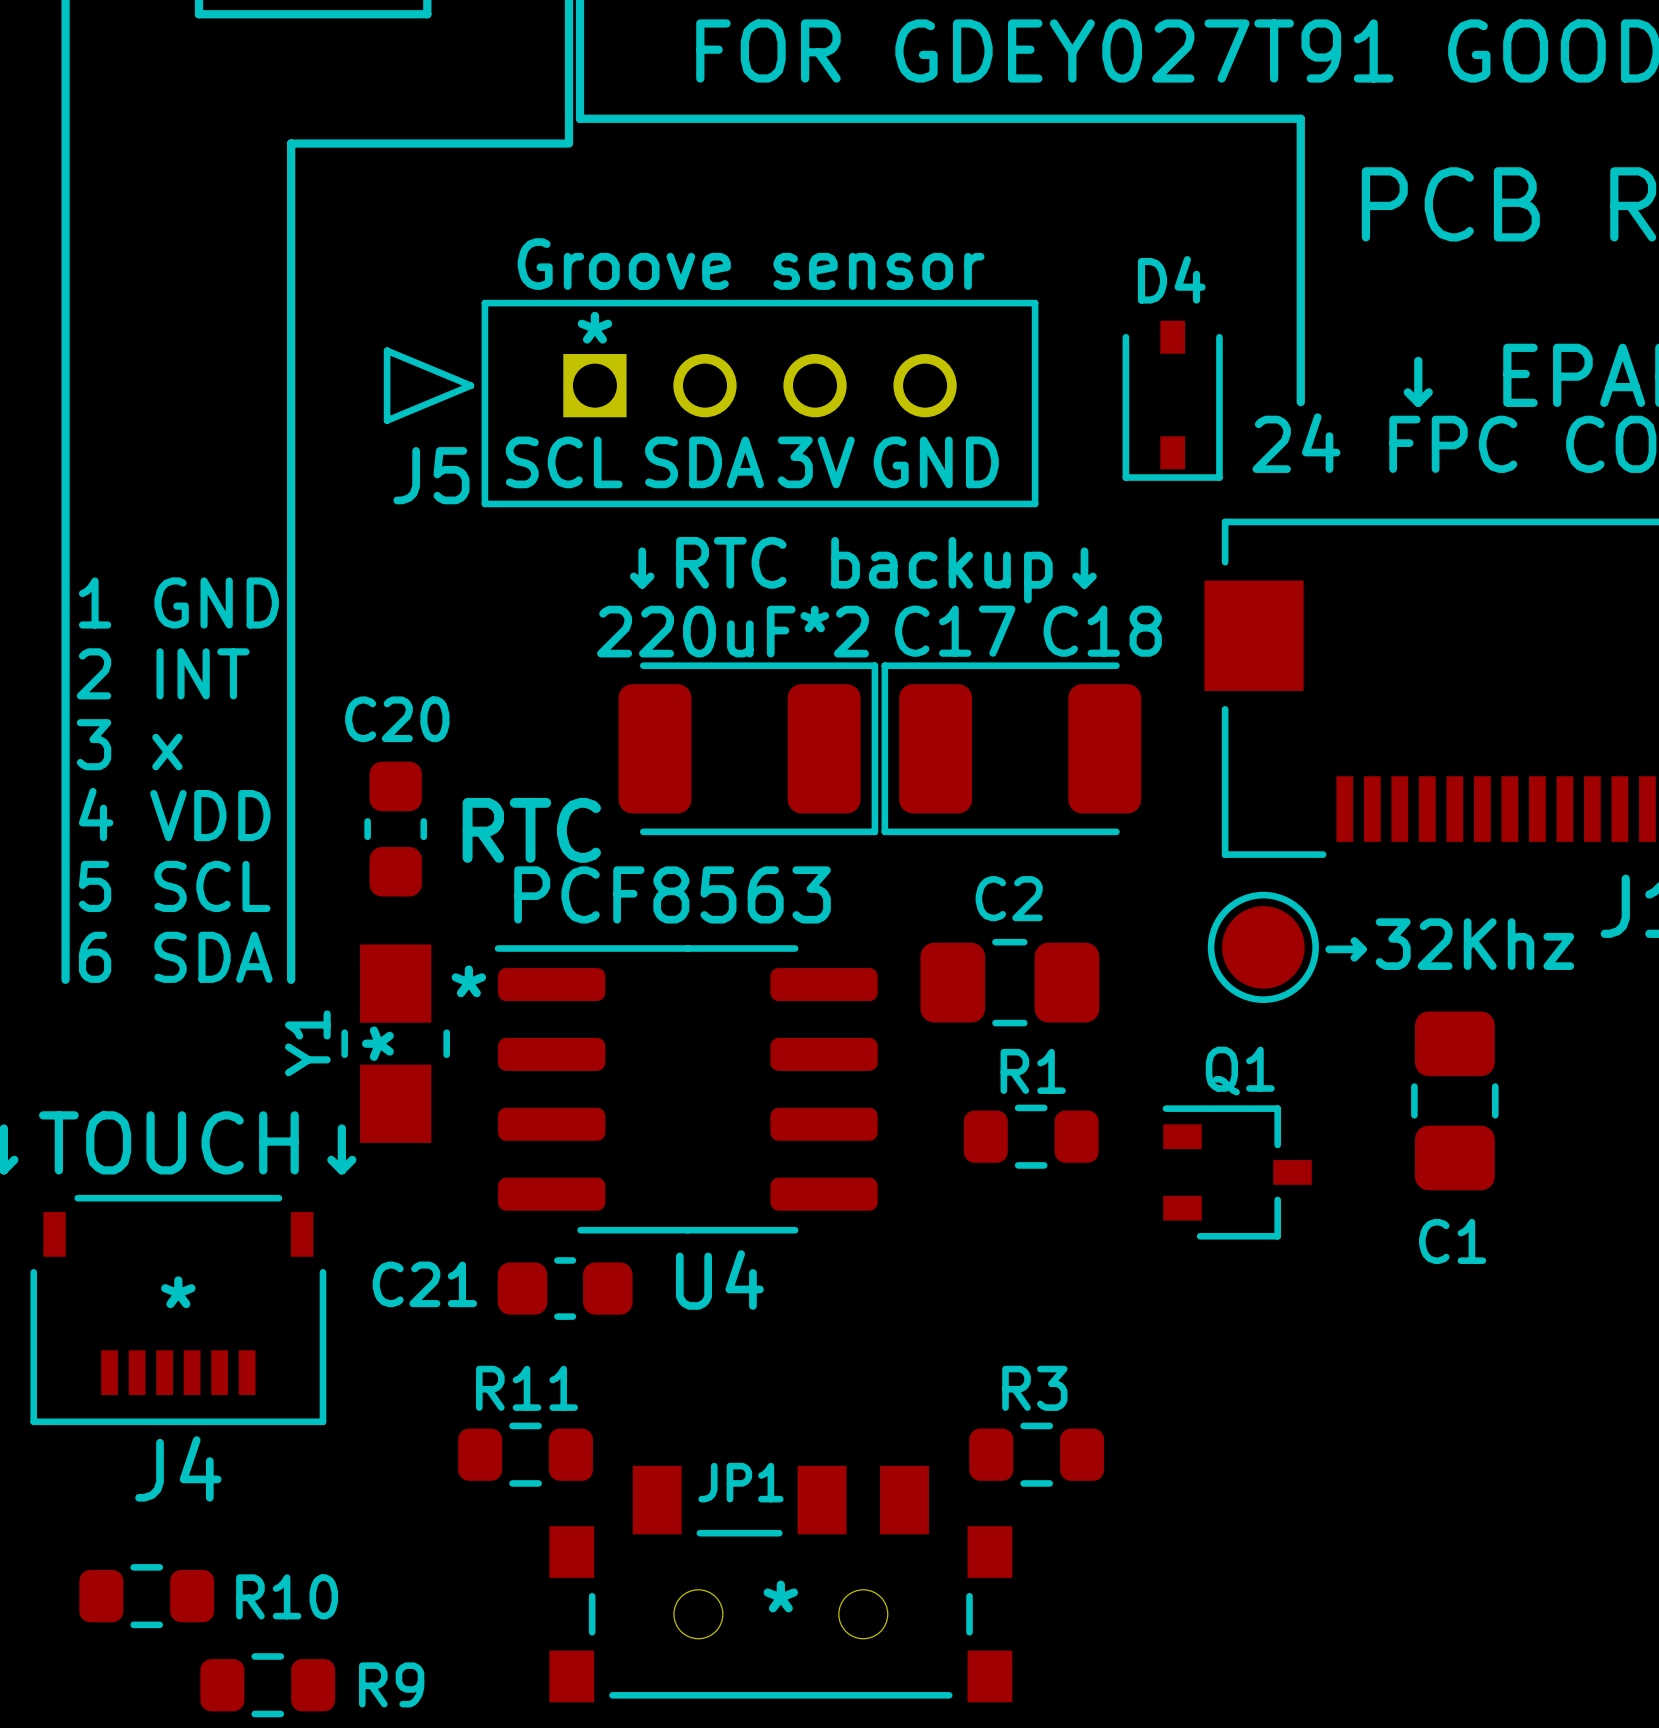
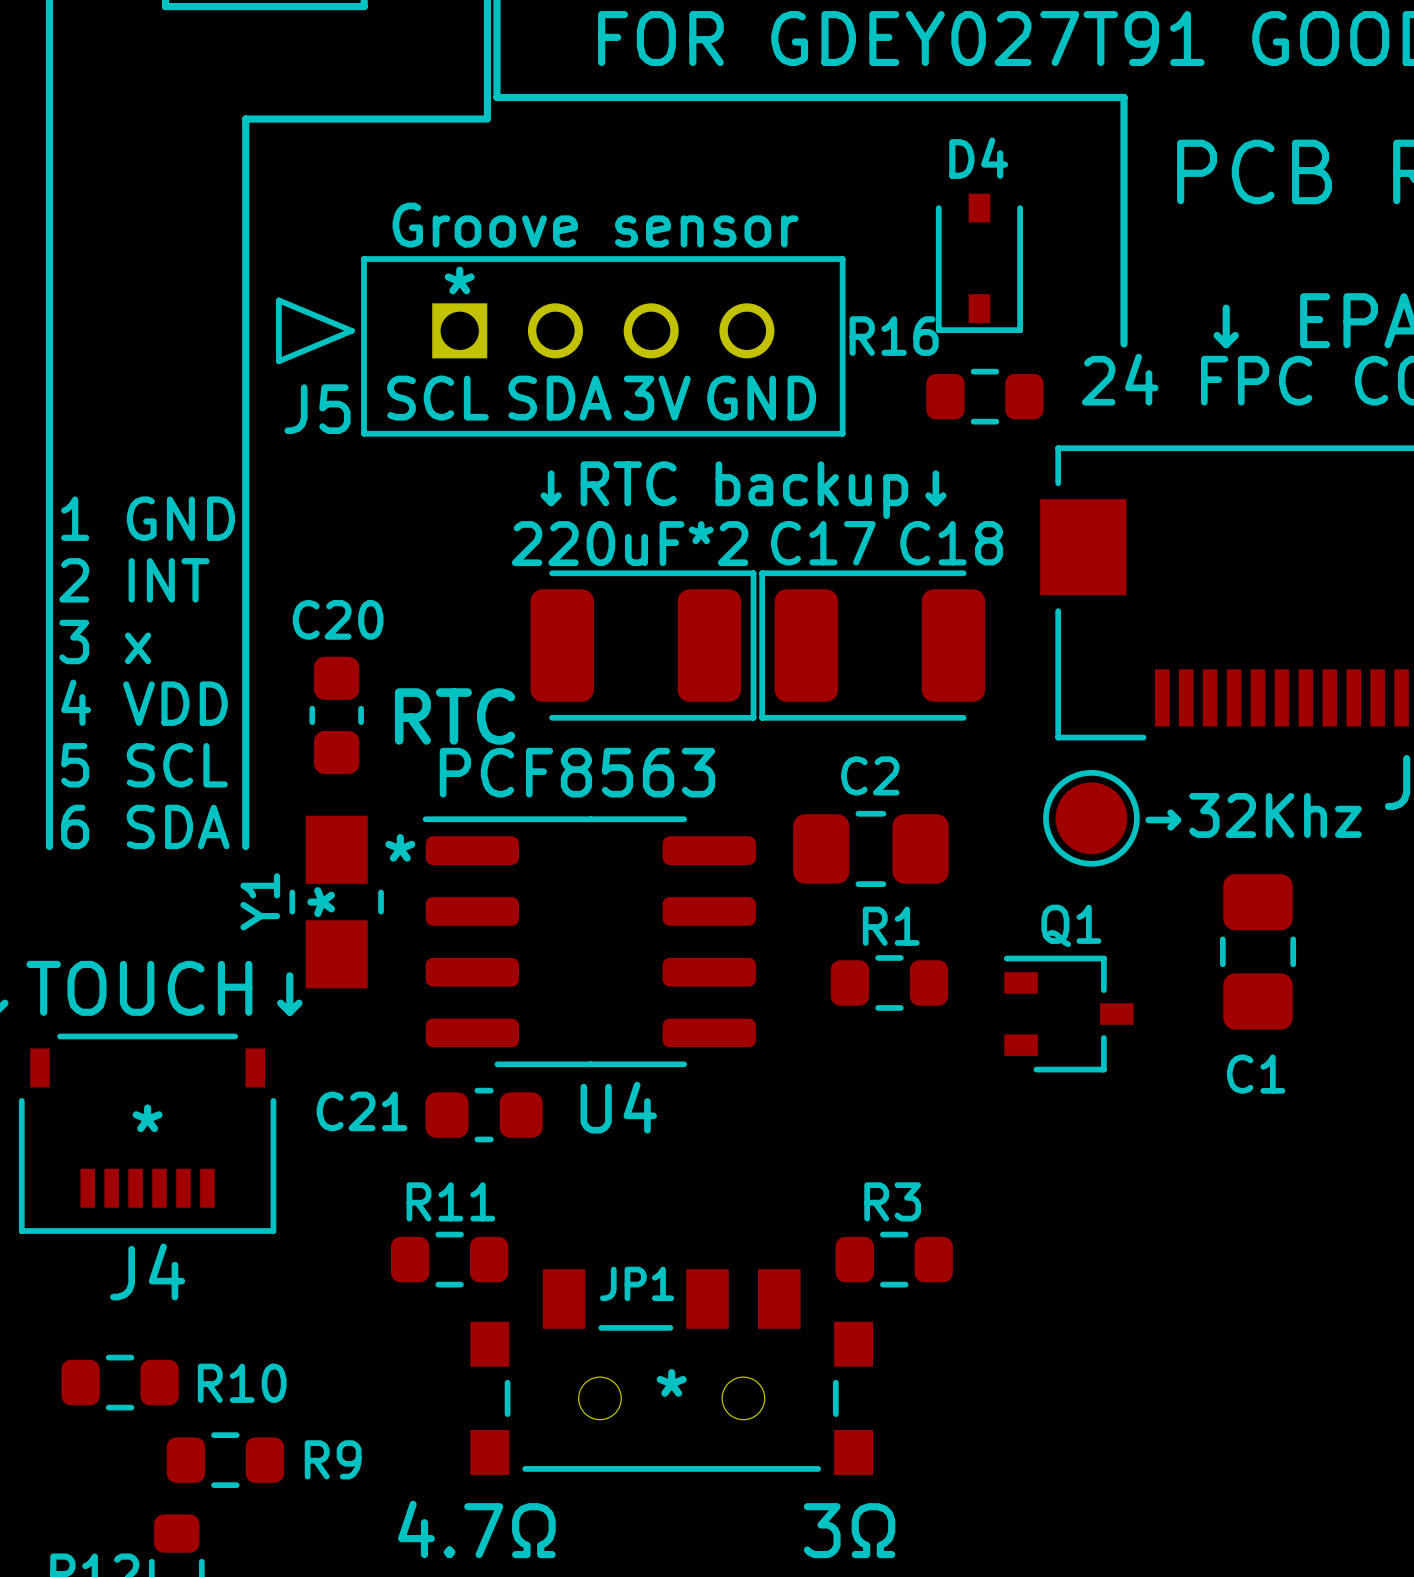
D4 position: (1172, 400) -> (979, 263)
J5 position: (711, 403) -> (560, 346)
text position: SCL (564, 462) -> SCL (438, 398)
text position: SDA (704, 462) -> SDA (560, 398)
text position: 3V (816, 462) -> 3V (657, 398)
text position: GND (936, 462) -> GND (761, 398)
R16: none -> (984, 396)

